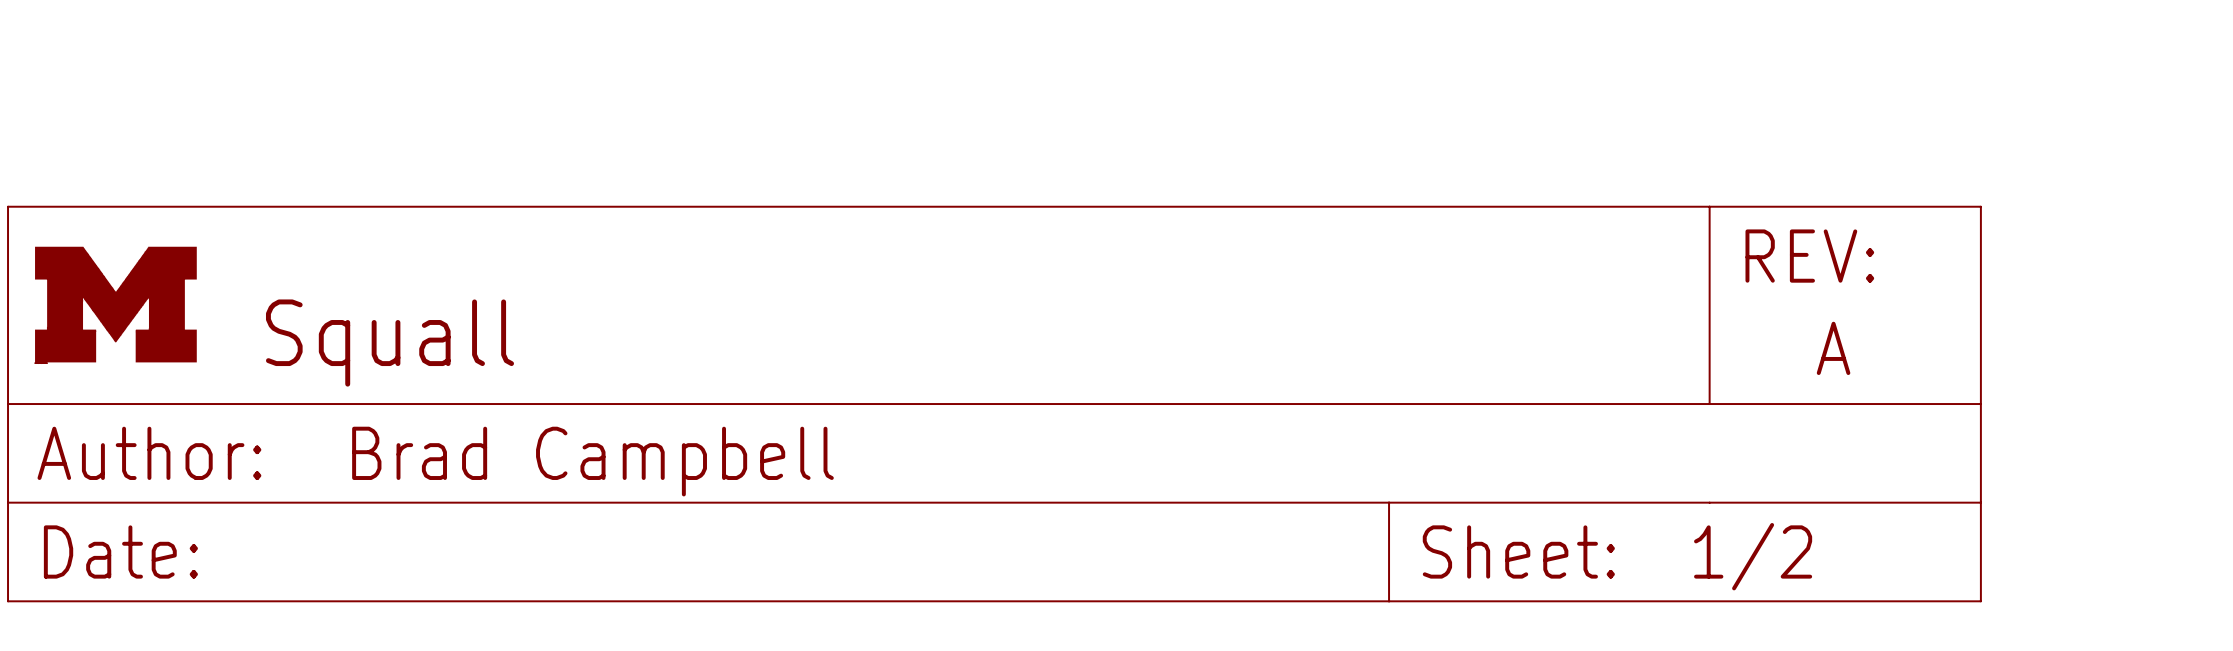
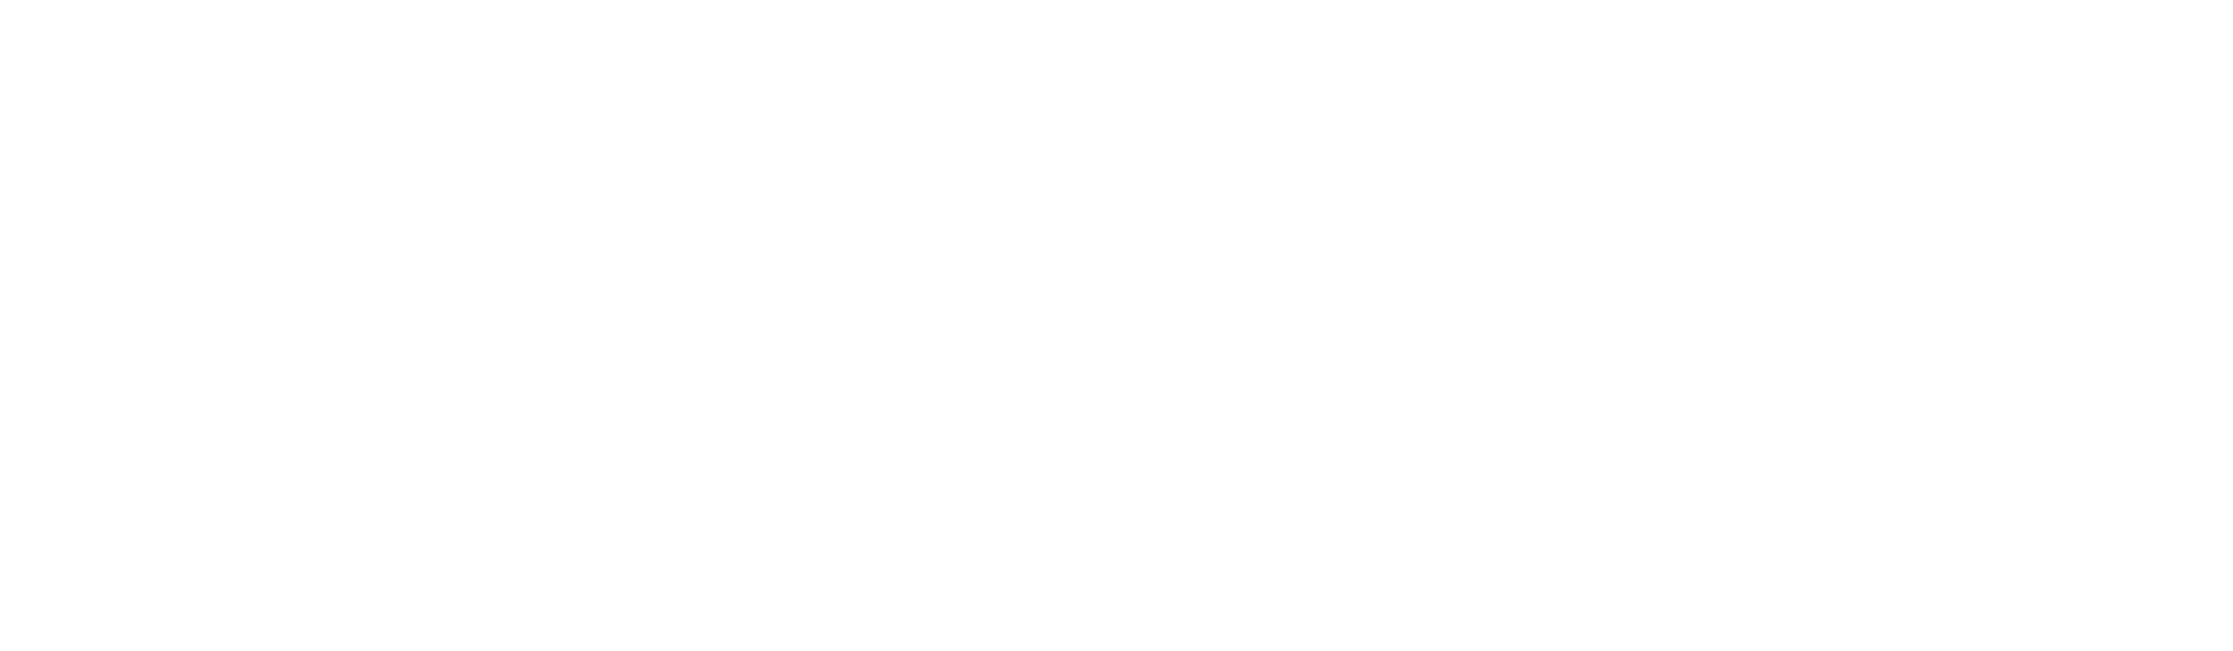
part: (994, 404) -> none

